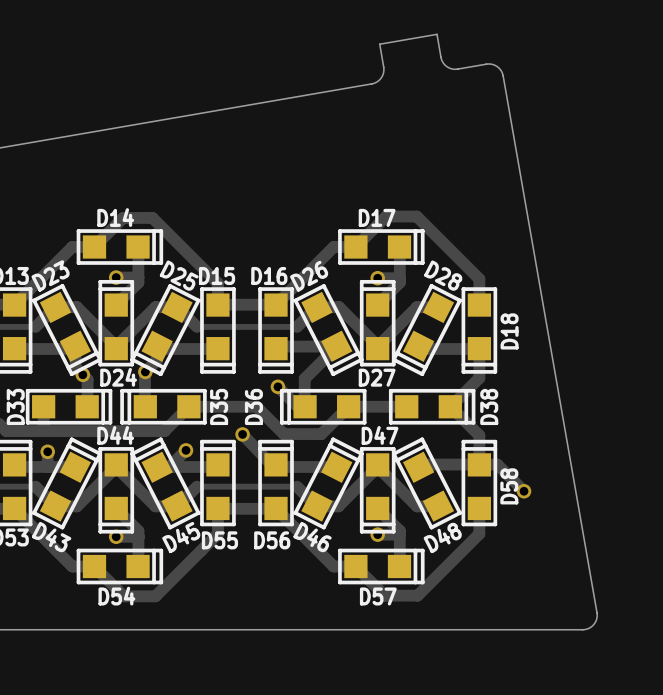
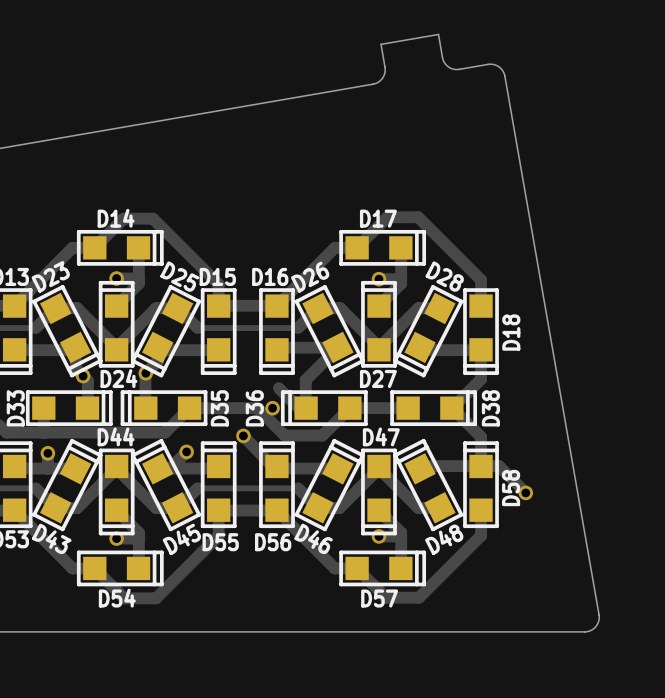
via position: (277, 386) -> (272, 408)

